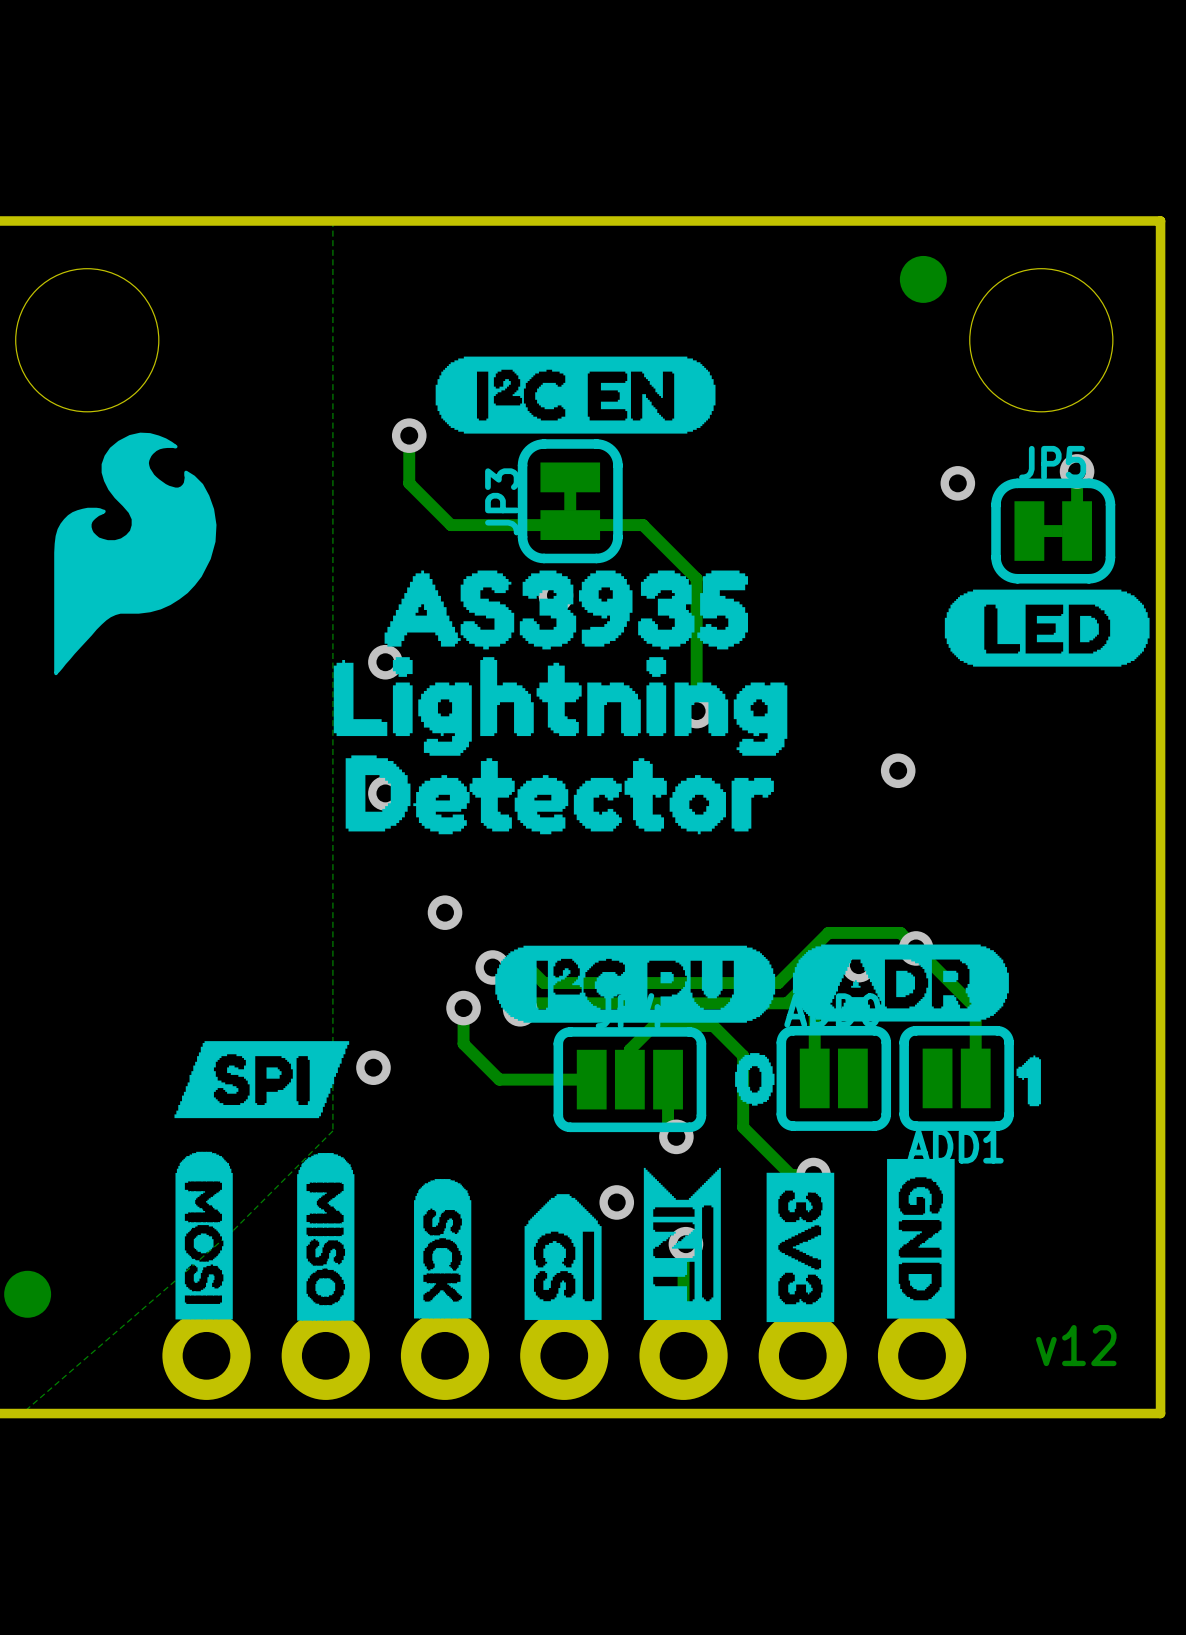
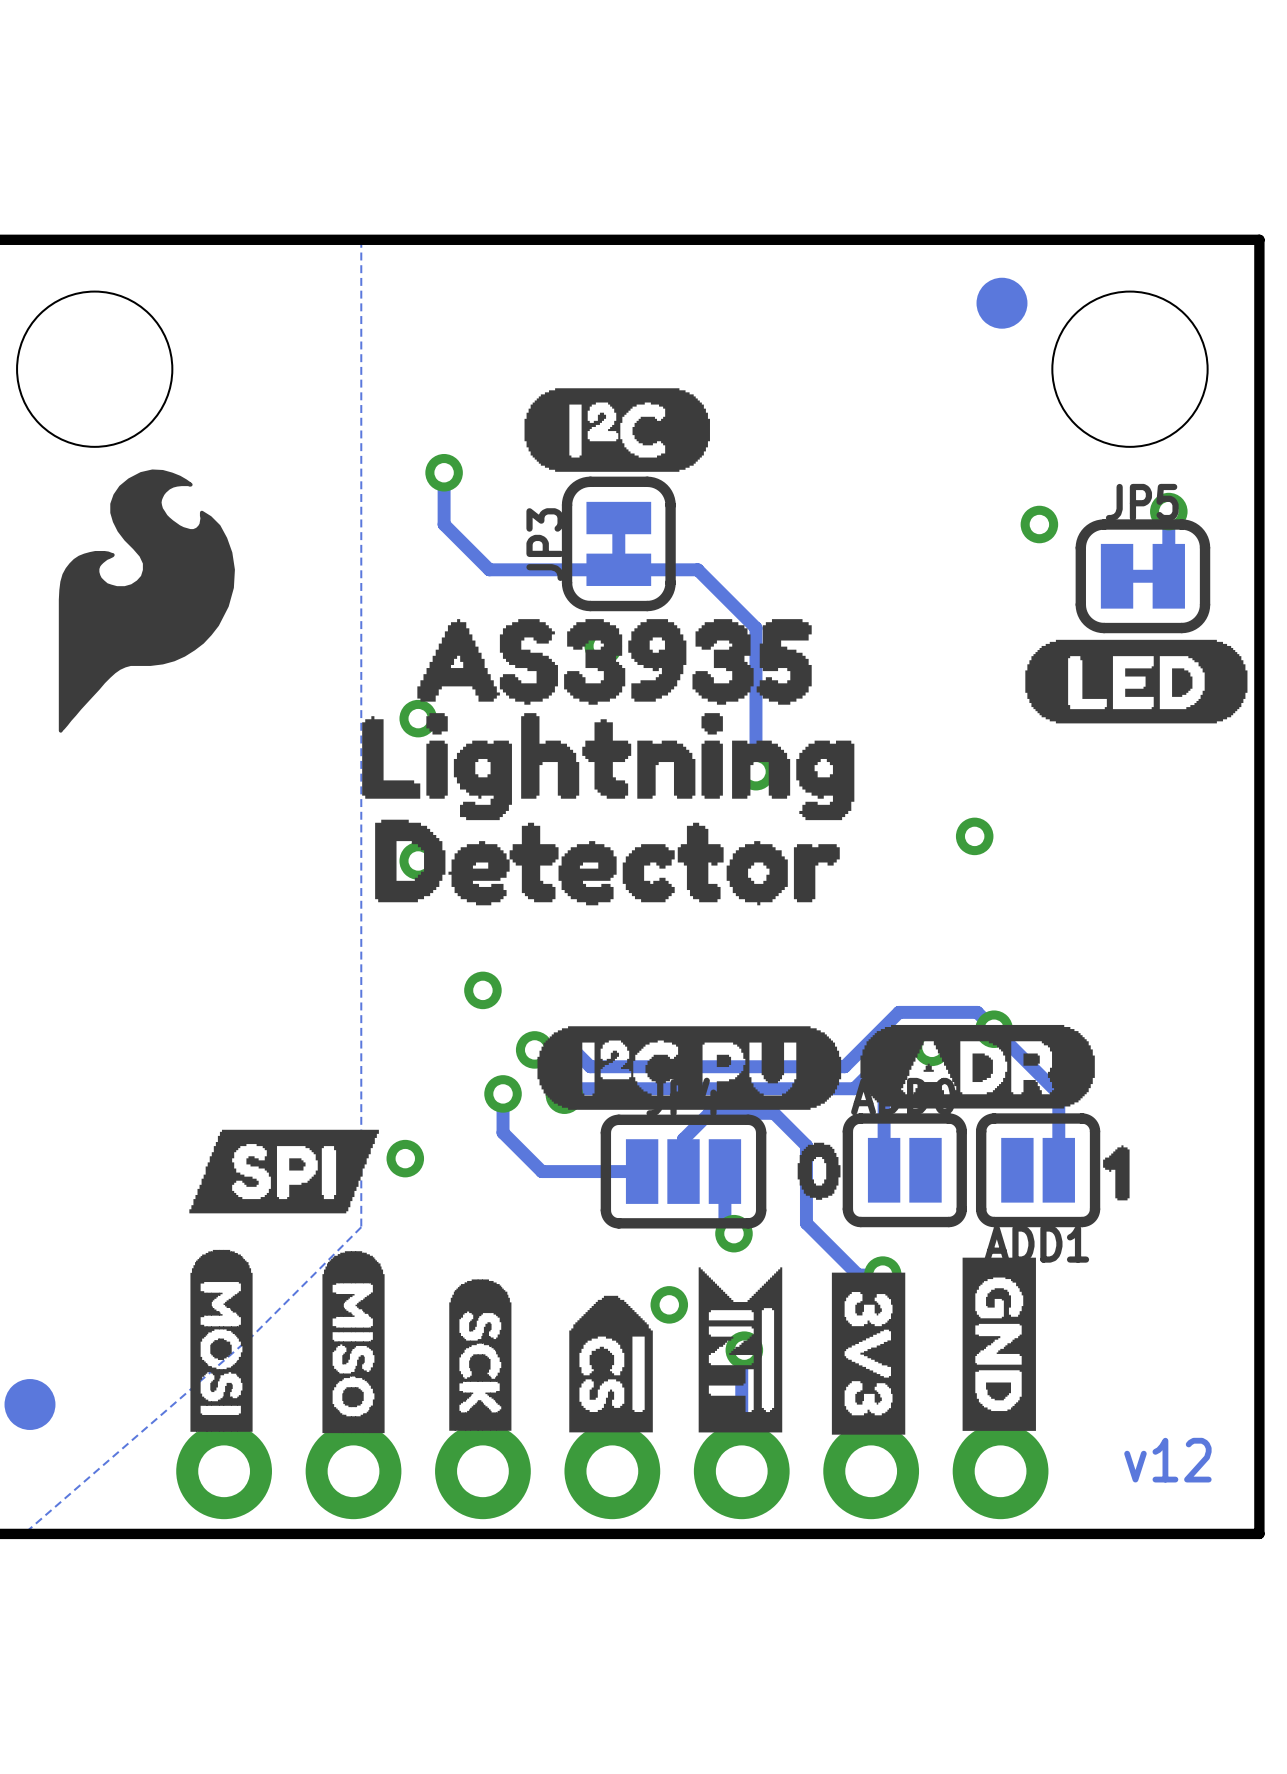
drawing shape: [435, 356, 716, 434] -> [524, 388, 710, 472]

